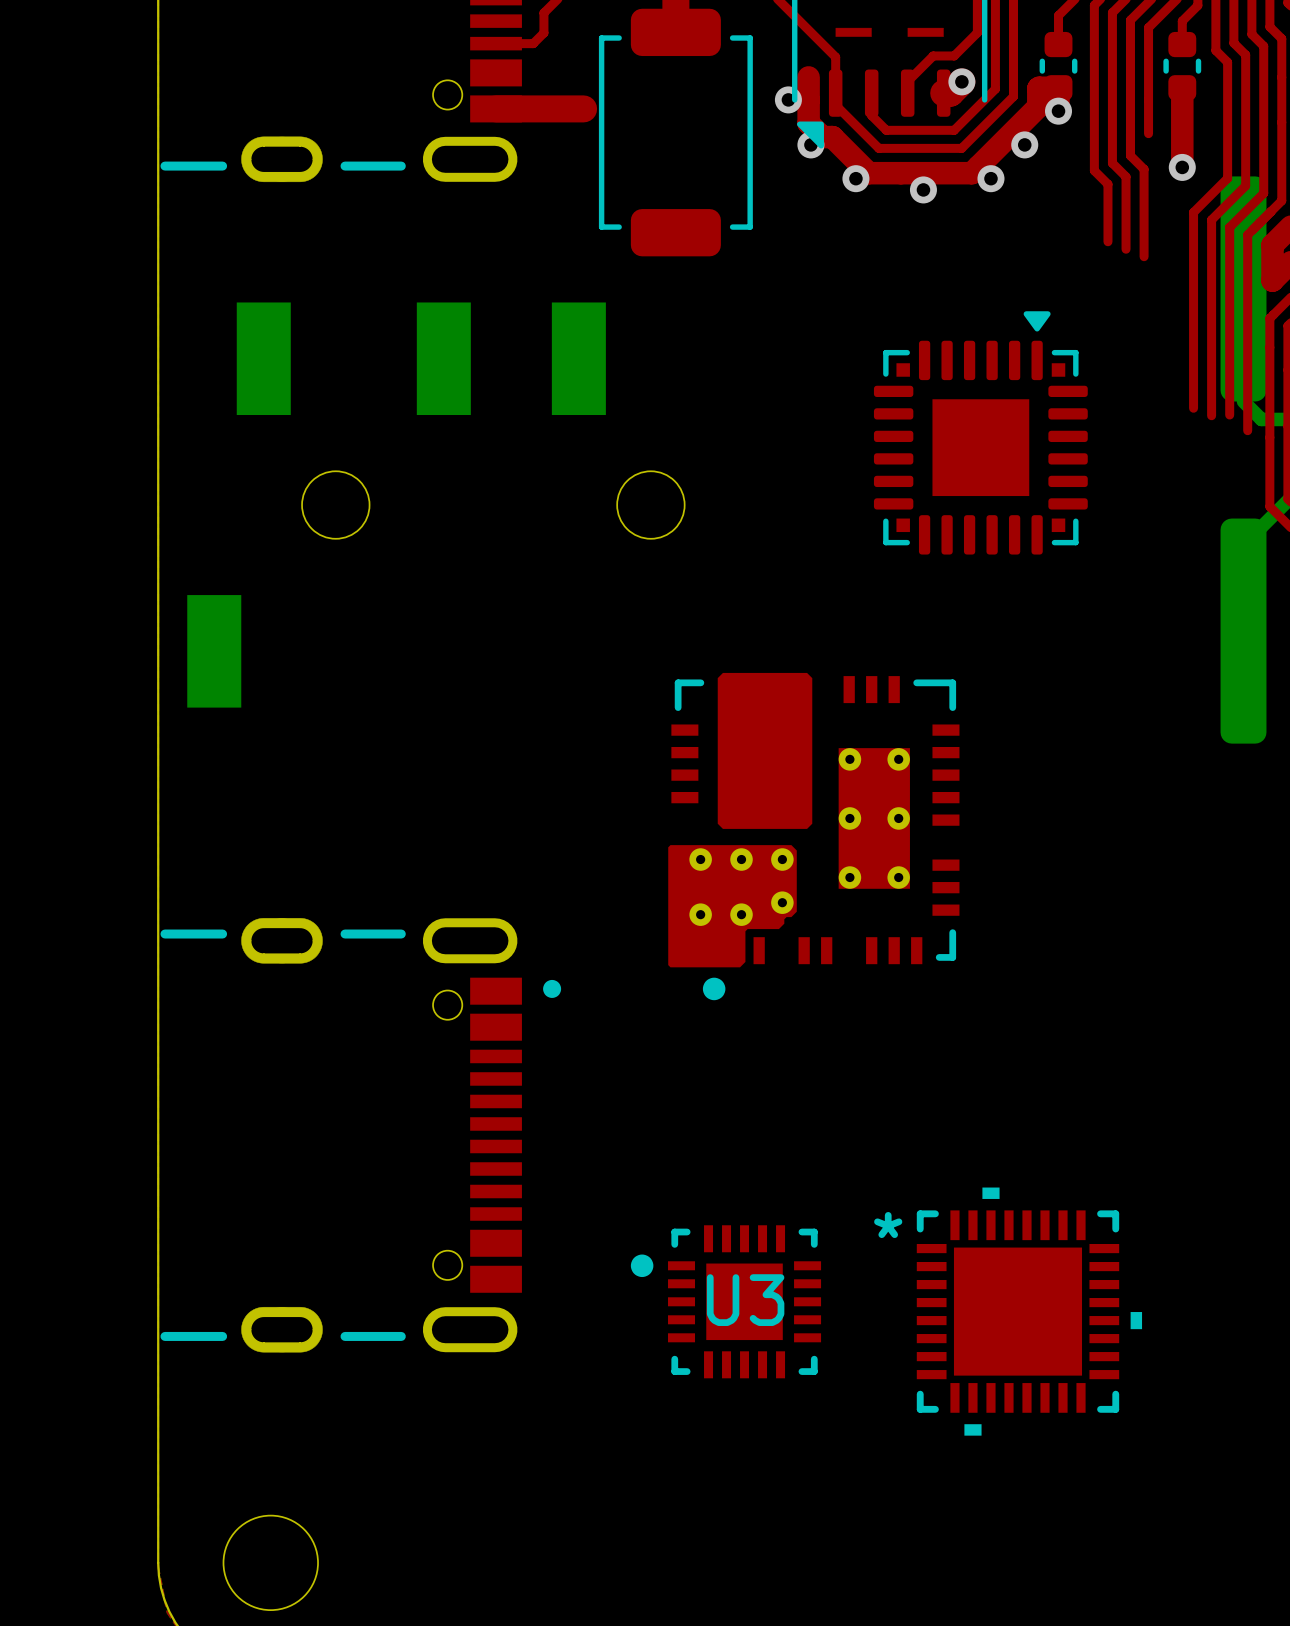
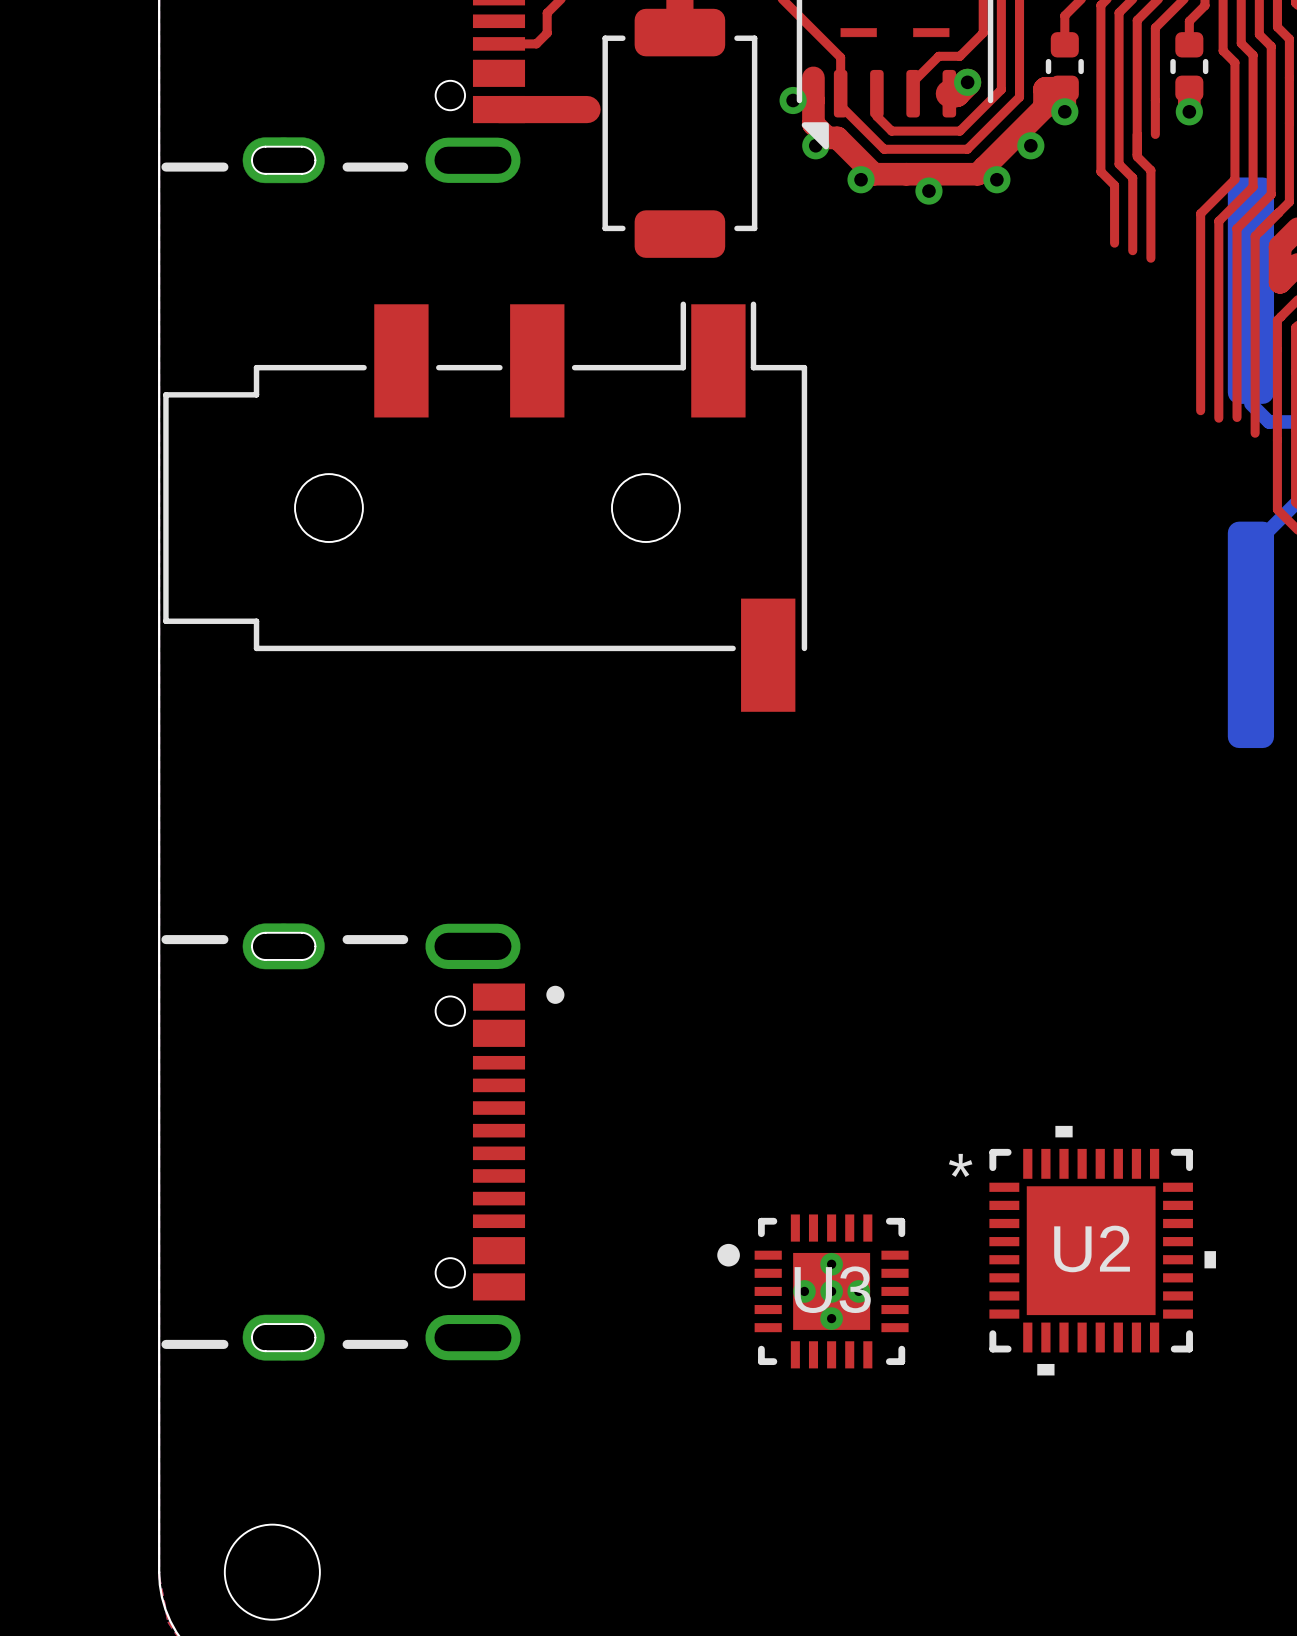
top track: (1182, 111) (1182, 167) -> none
via position: (1182, 167) -> (1189, 111)
part: (980, 432) -> none
part: none -> (485, 506)
part: (435, 505) -> none
part: (813, 836) -> none
U3 footprint: [630, 1225, 822, 1379] -> [717, 1214, 909, 1369]
U2: none -> (1102, 1250)
part: (1029, 1311) -> none

